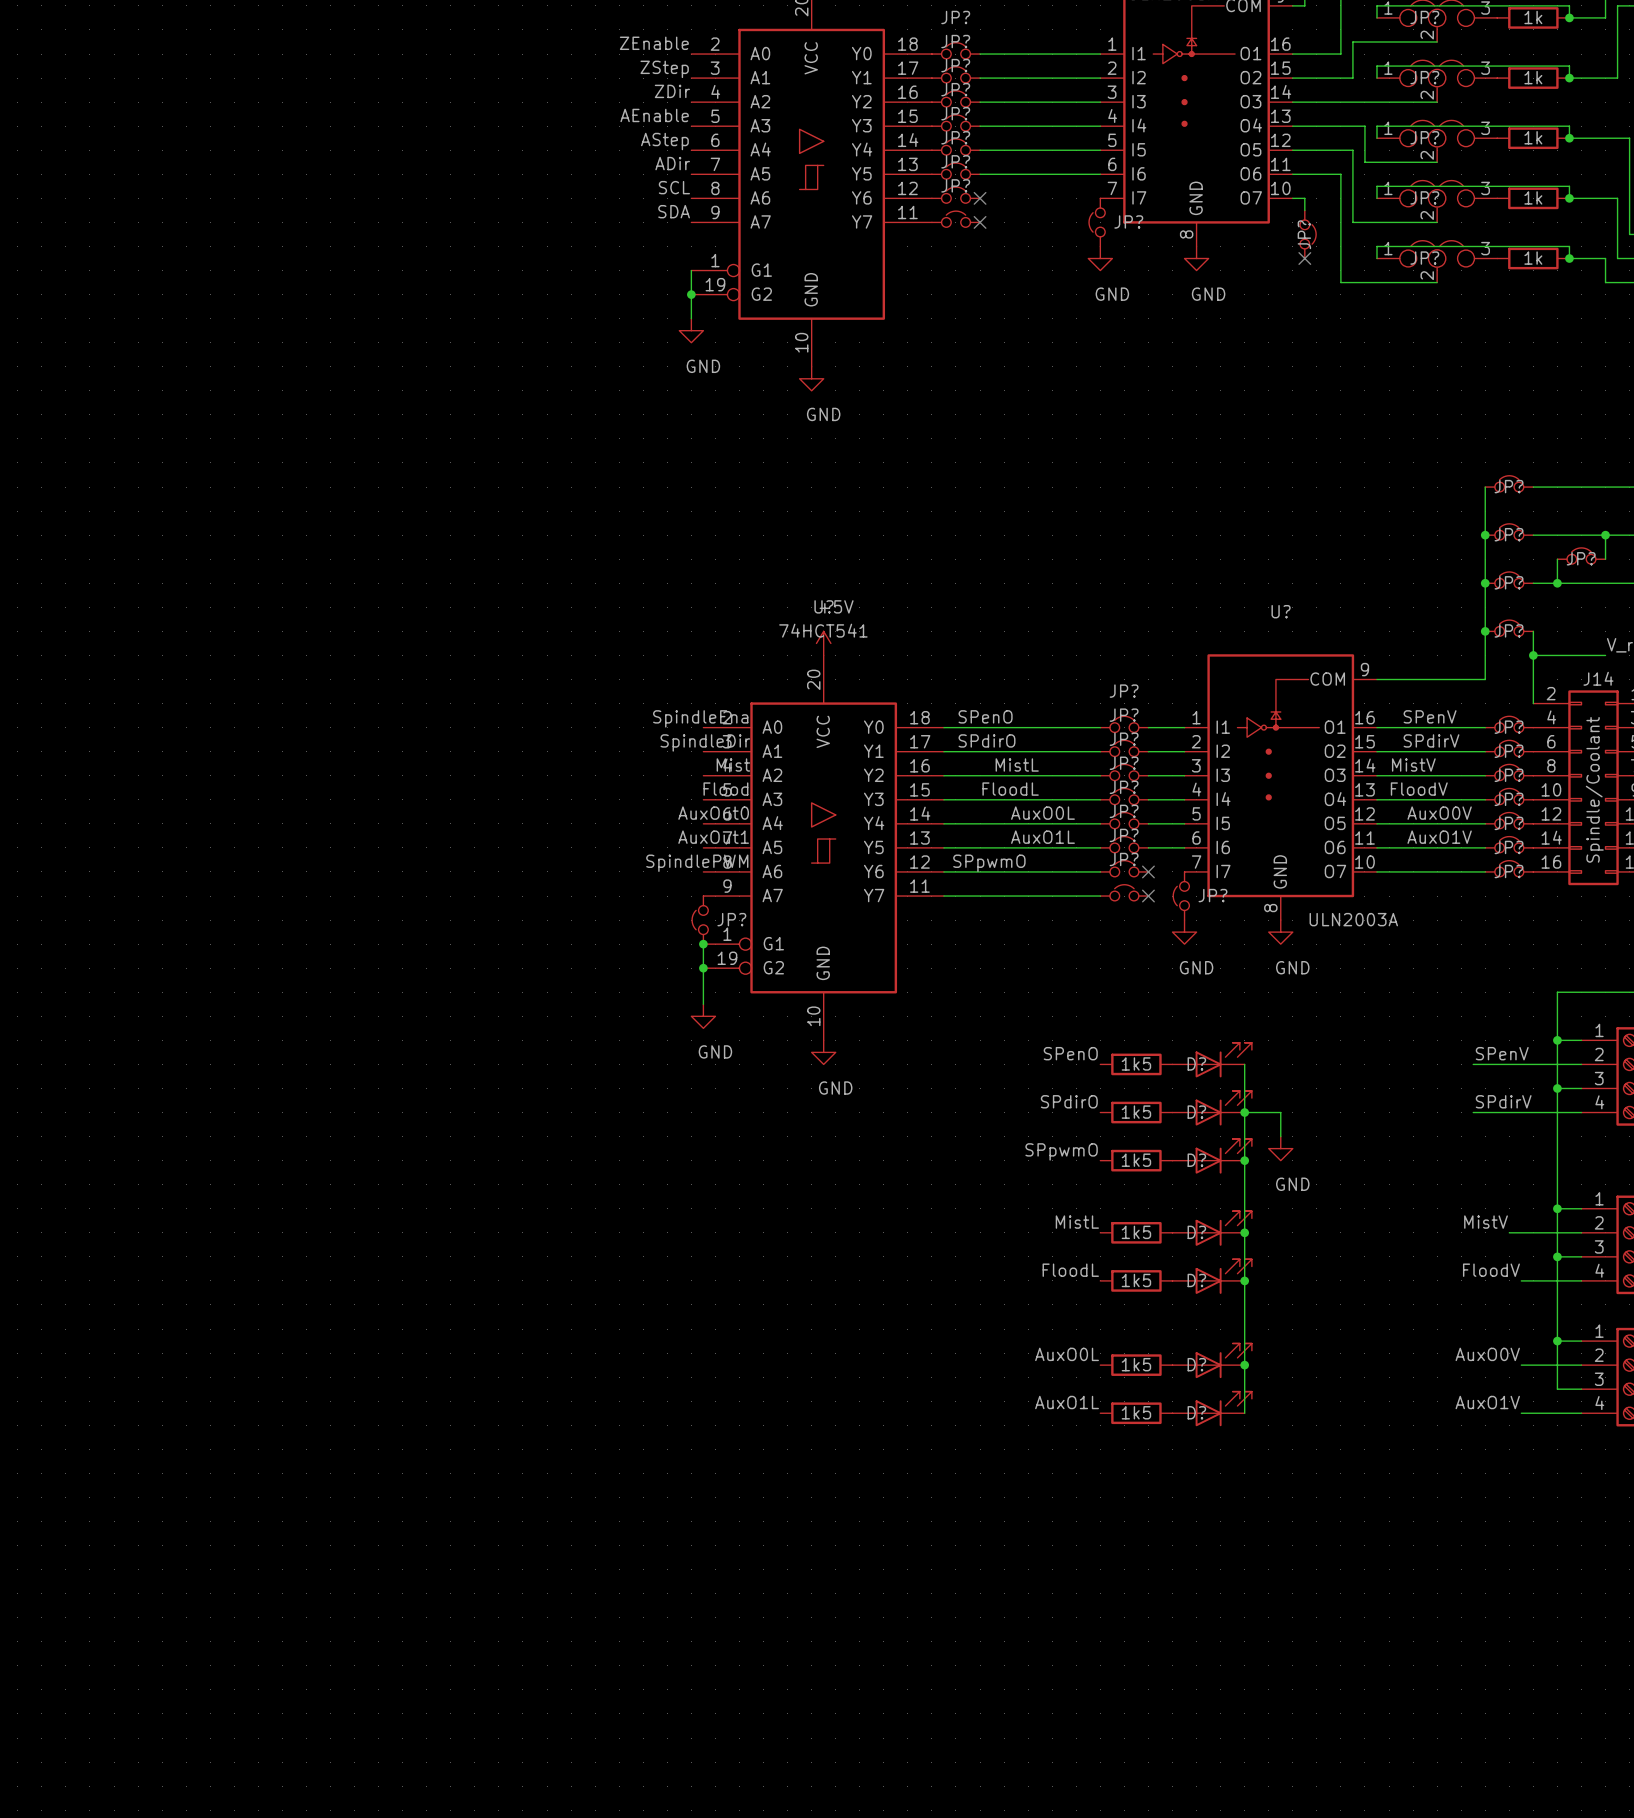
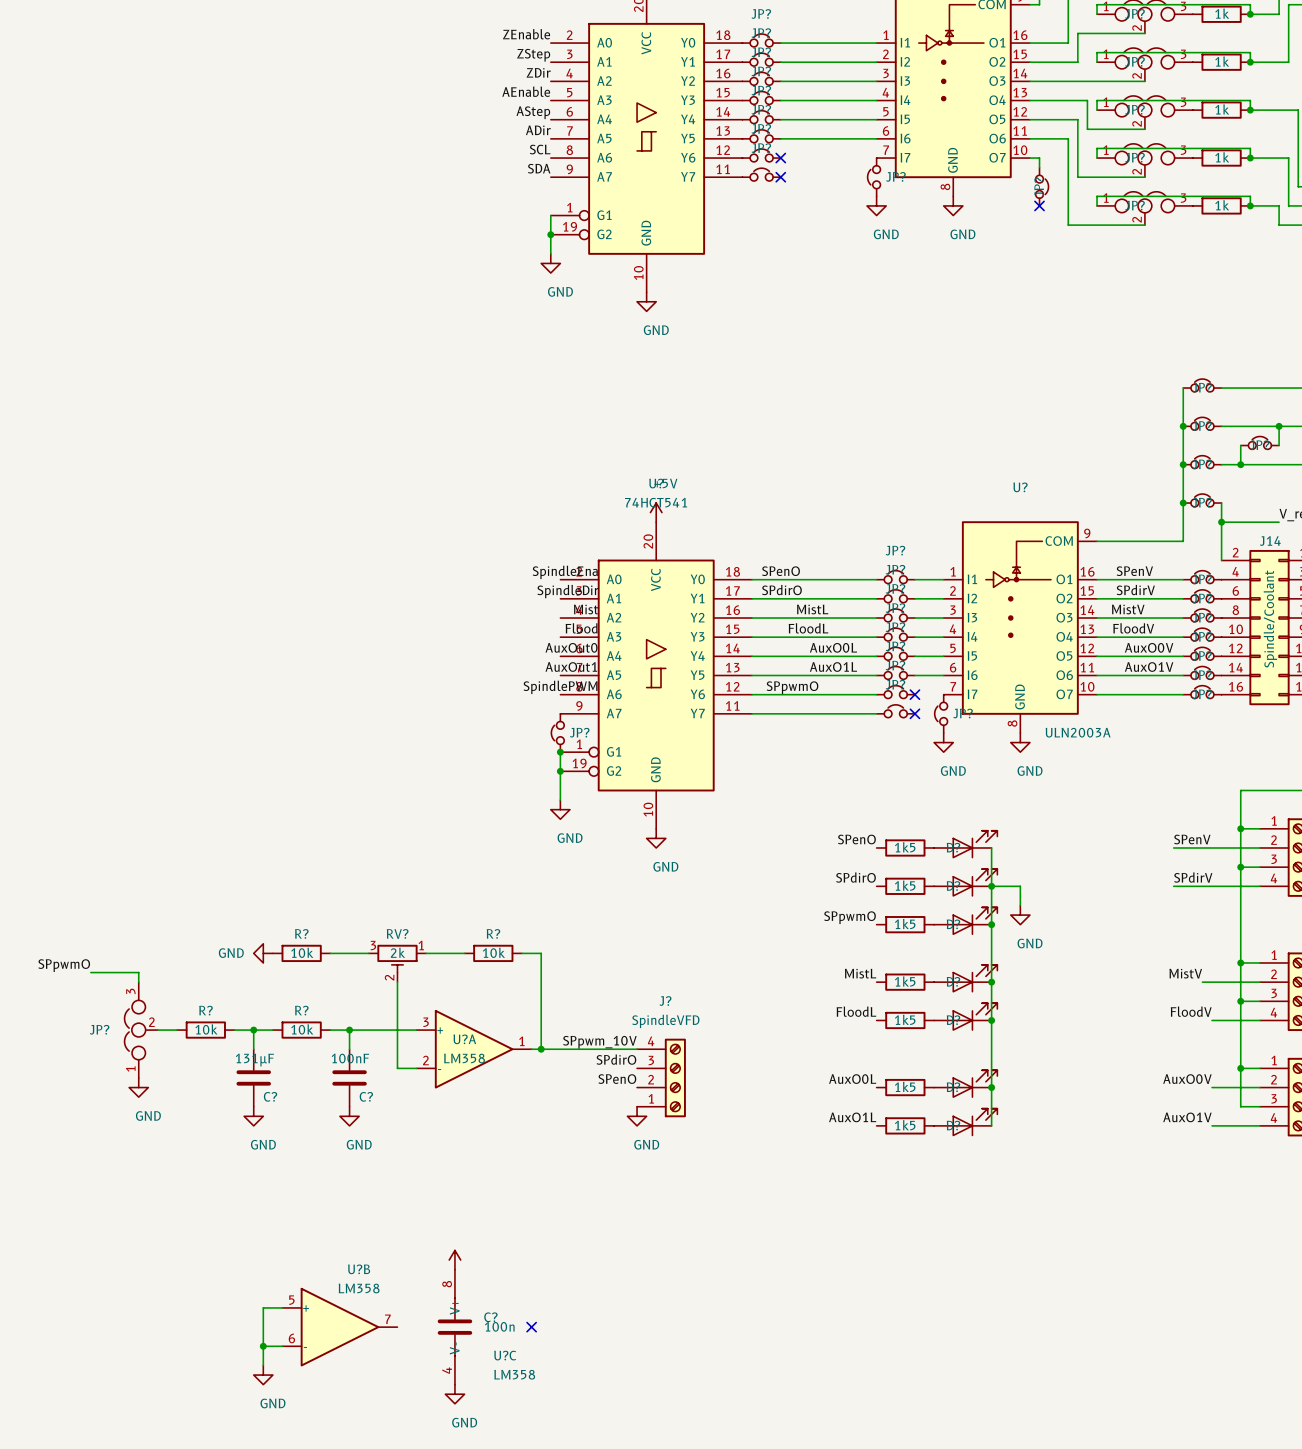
power symbol: none -> GND (263, 953)
R?: none -> 10k (301, 953)
wire: none -> (330, 953) (368, 953)
wire: none -> (426, 953) (464, 953)
R?: none -> 10k (493, 953)
wire: none -> (522, 953) (541, 953) (541, 1049)
RV?: none -> 2k (397, 963)
label: none -> SPpwmO (64, 965)
wire: none -> (90, 972) (138, 972) (138, 982)
wire: none -> (397, 982) (397, 1068) (416, 1068)
JP?: none -> (141, 1030)
wire: none -> (157, 1030) (177, 1030)
R?: none -> 10k (205, 1030)
wire: none -> (234, 1030) (272, 1030)
wire: none -> (253, 1030) (253, 1049)
junction: none -> (253, 1030)
R?: none -> 10k (301, 1030)
wire: none -> (330, 1030) (416, 1030)
wire: none -> (349, 1030) (349, 1049)
junction: none -> (349, 1030)
label: none -> SPpwm_10V (599, 1042)
U?A: none -> LM358 (474, 1049)
wire: none -> (531, 1049) (637, 1049)
junction: none -> (541, 1049)
label: none -> SPdirO (616, 1059)
C?: none -> 131µF (253, 1077)
C?: none -> 100nF (349, 1077)
J?: none -> SpindleVFD (661, 1077)
label: none -> SPenO (617, 1079)
power symbol: none -> GND (138, 1087)
power symbol: none -> GND (253, 1116)
power symbol: none -> GND (349, 1116)
power symbol: none -> GND (637, 1116)
power symbol: none -> (454, 1260)
wire: none -> (282, 1307) (263, 1307) (263, 1365)
U?B: none -> LM358 (339, 1327)
U?C: none -> LM358 (454, 1327)
C?: none -> 100n (454, 1327)
no-connect mark: none -> (531, 1327)
wire: none -> (263, 1346) (282, 1346)
junction: none -> (263, 1346)
power symbol: none -> GND (263, 1375)
power symbol: none -> GND (454, 1394)

